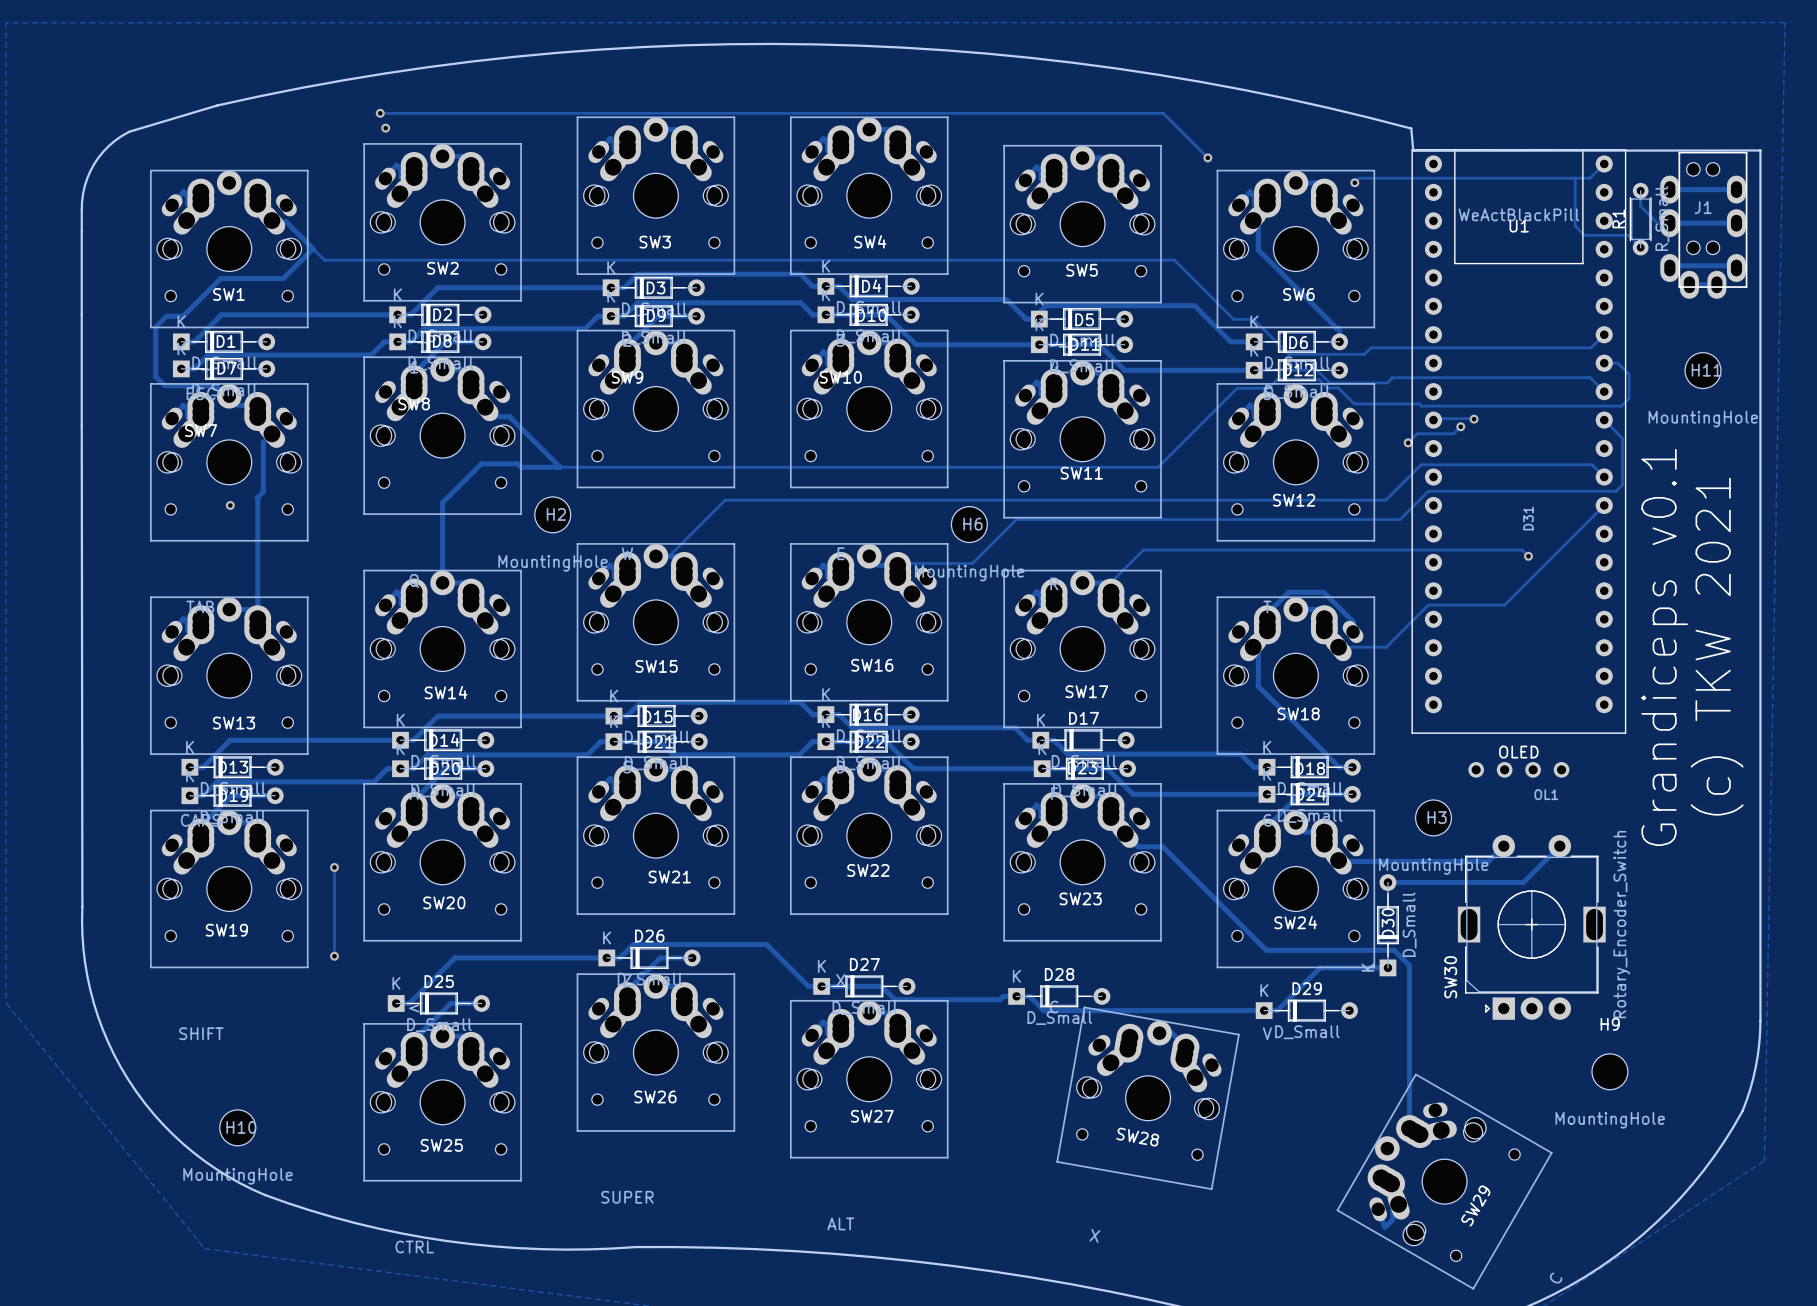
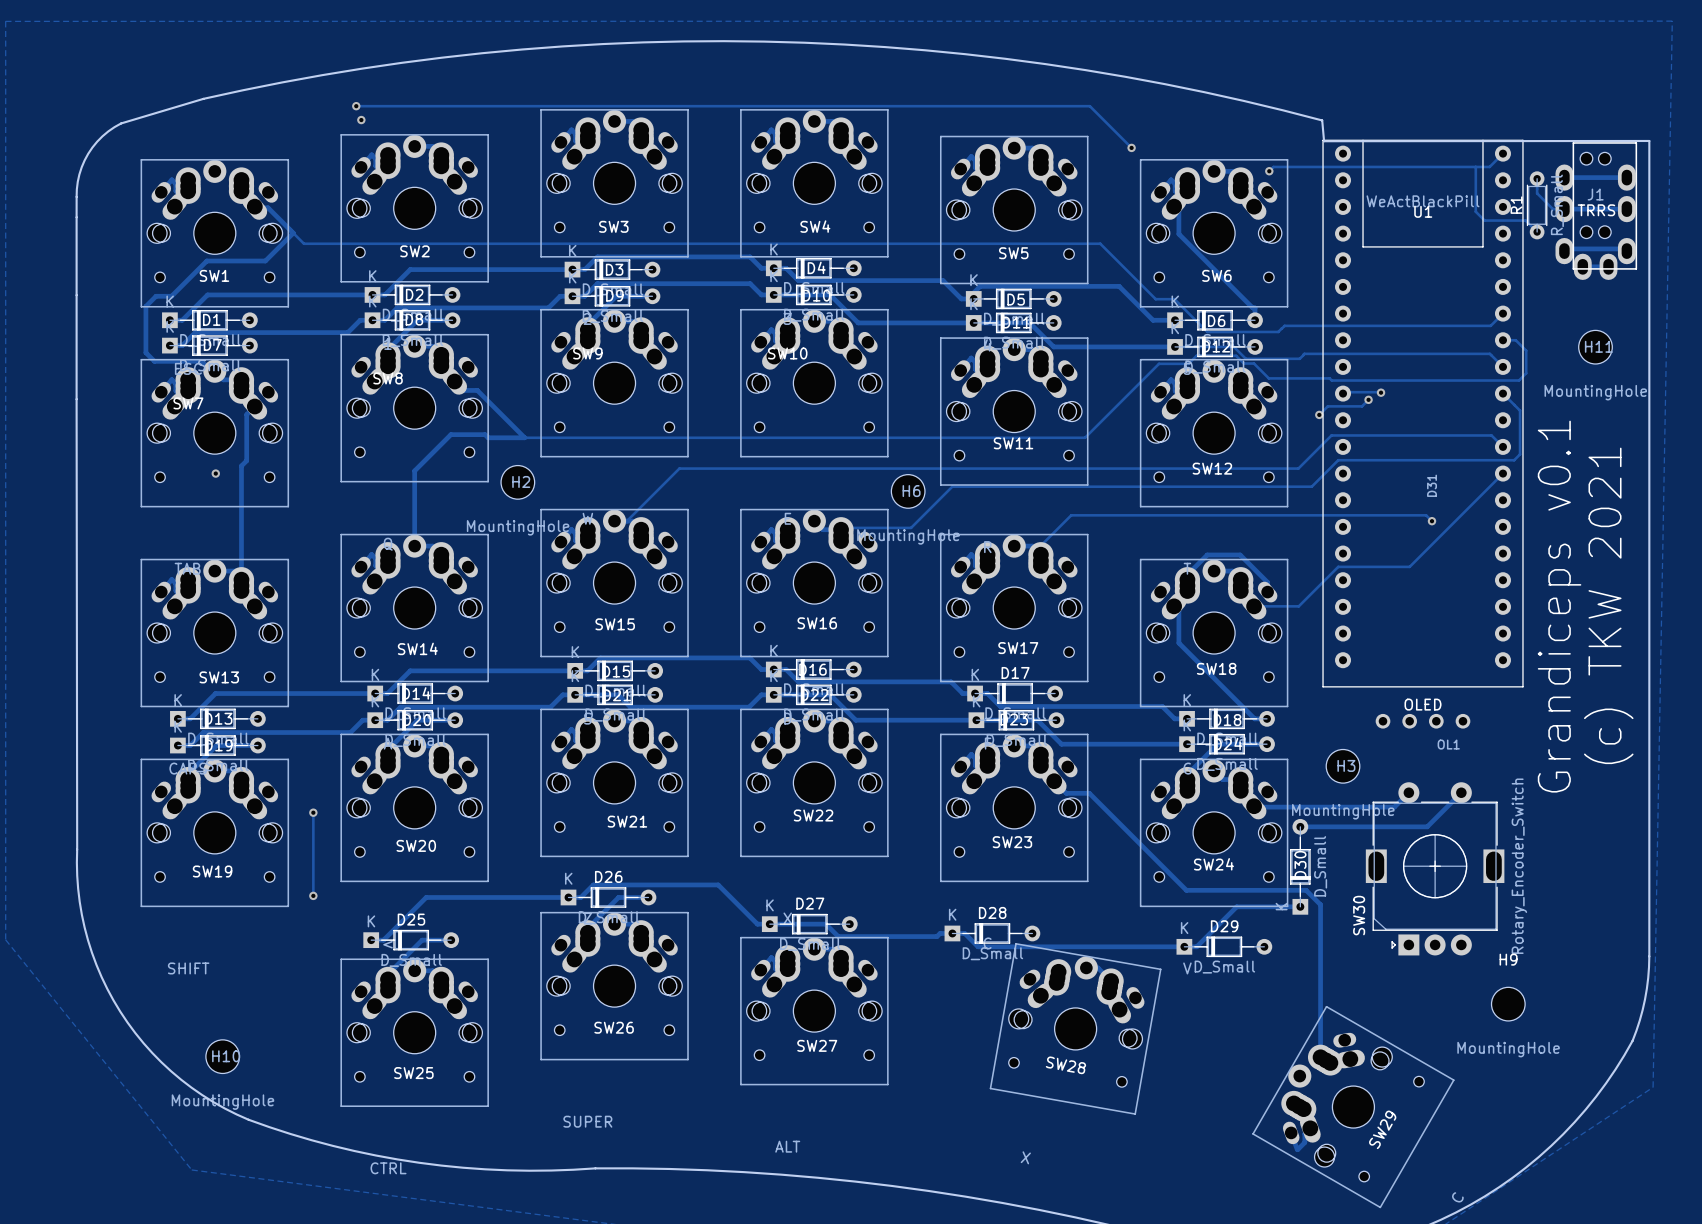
J1 text: none -> TRRS (1596, 210)

